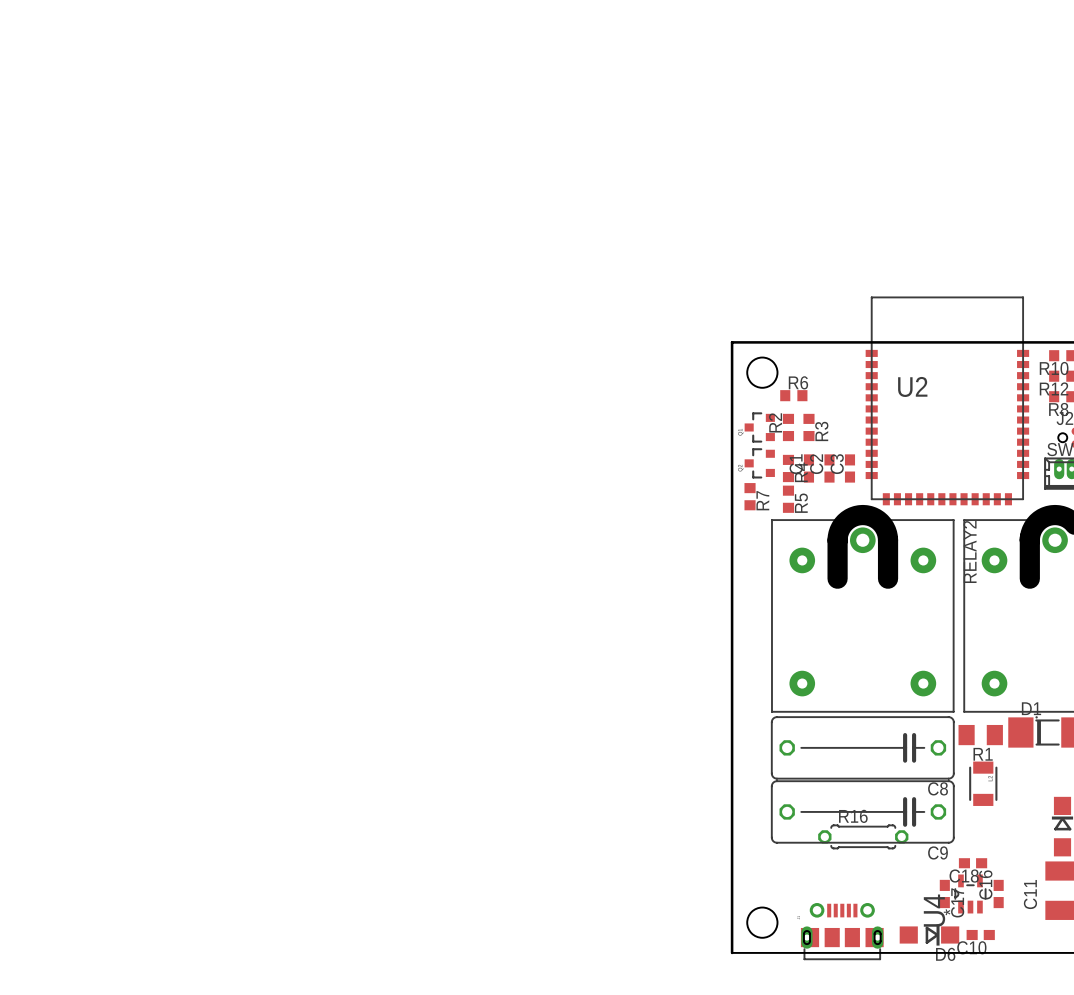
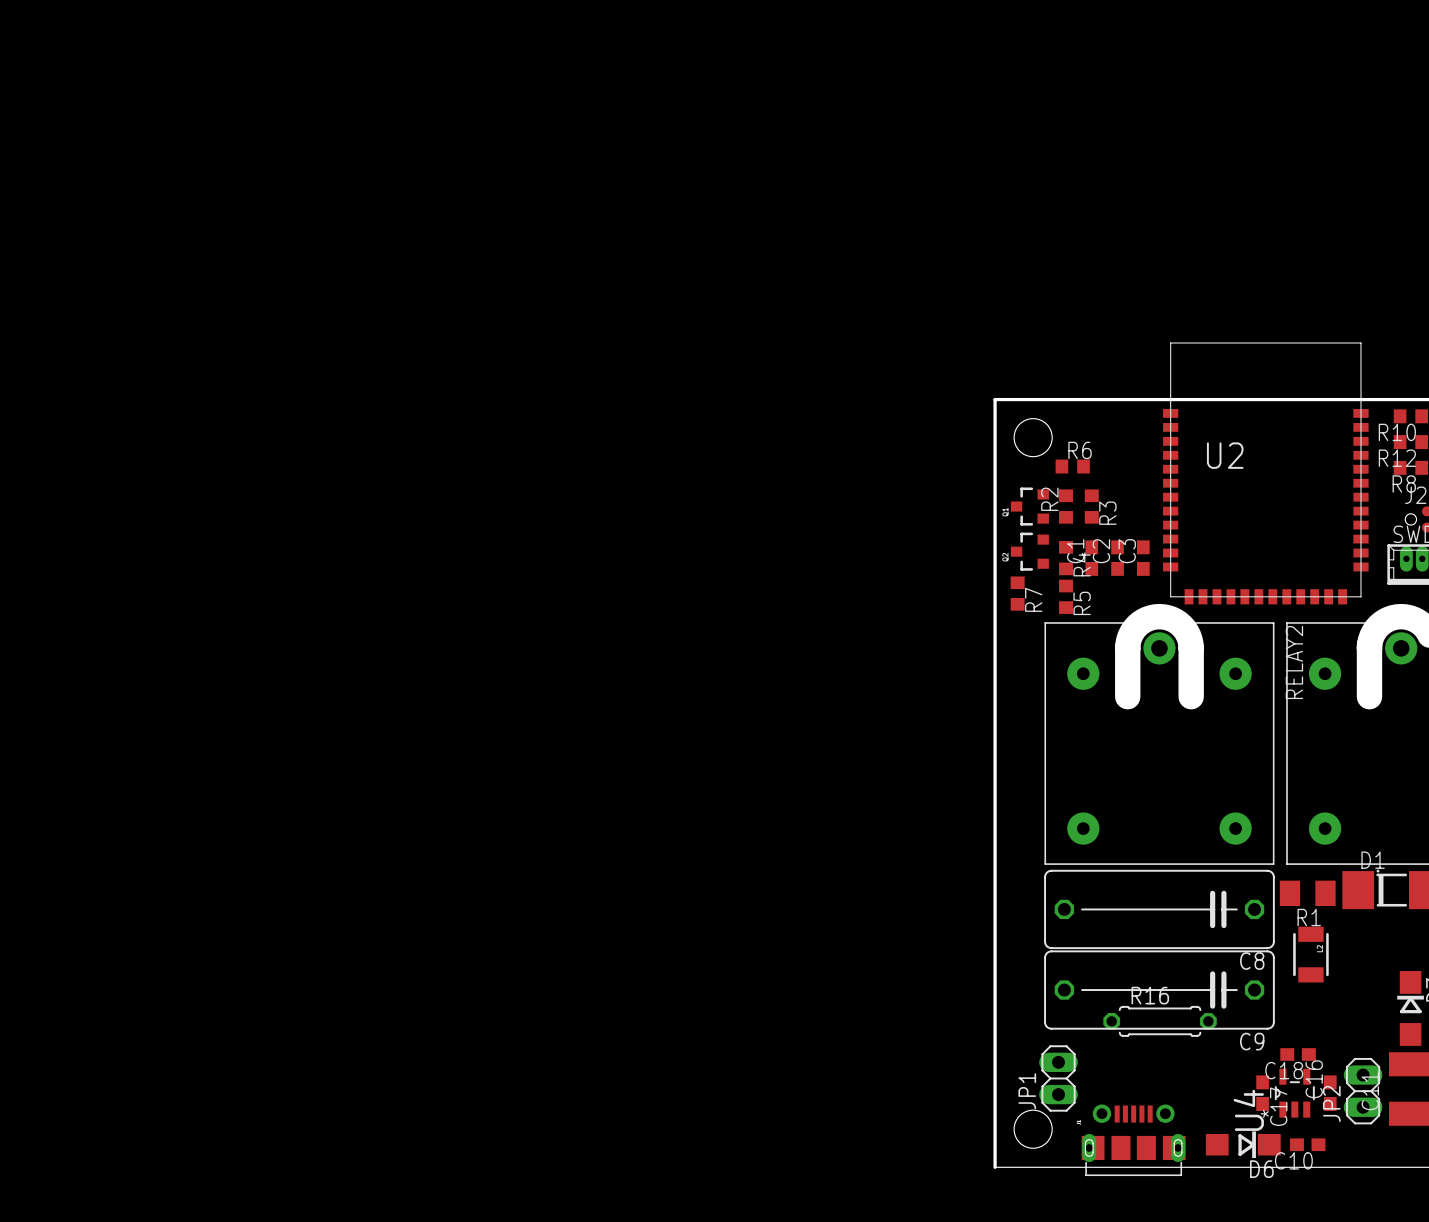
JP1: none -> (1058, 1078)
JP2: none -> (1363, 1091)

